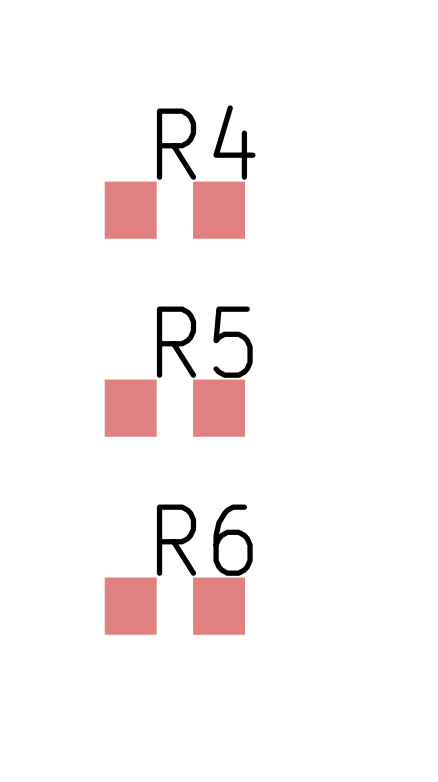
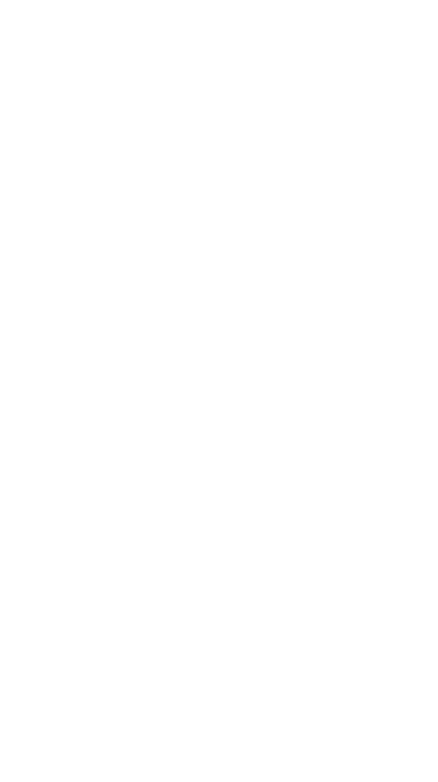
R4: (174, 210) -> none
R5: (174, 408) -> none
R6: (174, 606) -> none

